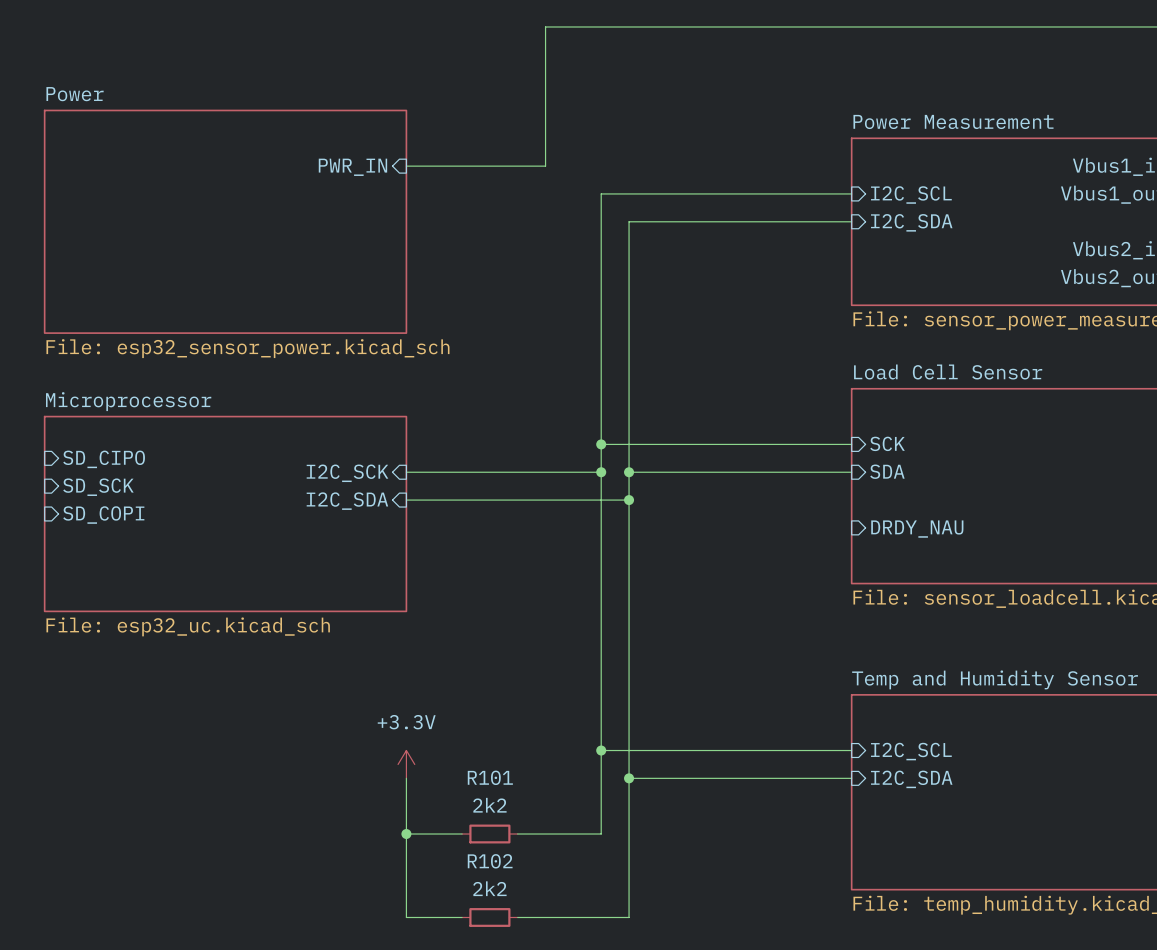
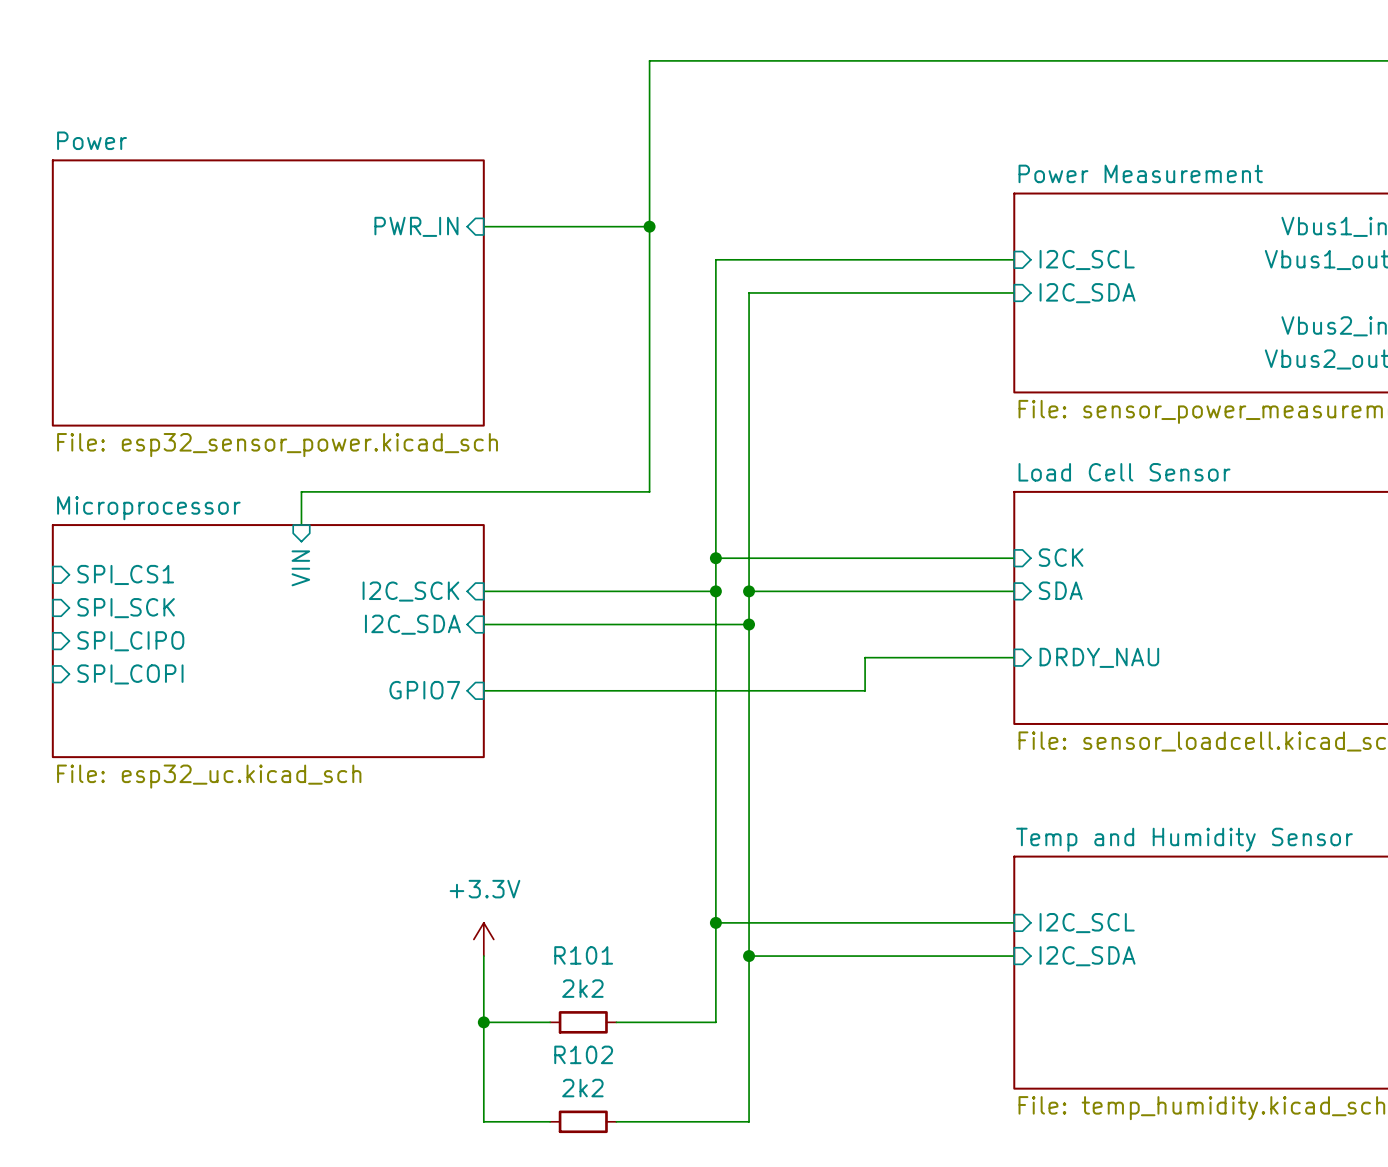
wire: none -> (649, 226) (649, 491) (301, 491) (301, 525)
junction: none -> (649, 226)
sheet pin: none -> VIN (300, 568)
sheet pin: SD_CIPO (104, 459) -> SPI_CS1 (125, 574)
sheet pin: SD_SCK (98, 487) -> SPI_SCK (126, 608)
sheet pin: SD_COPI (103, 515) -> SPI_CIPO (130, 641)
wire: none -> (1014, 657) (865, 657) (865, 690) (483, 690)
sheet pin: none -> SPI_COPI (130, 674)
sheet pin: none -> GPIO7 (424, 690)

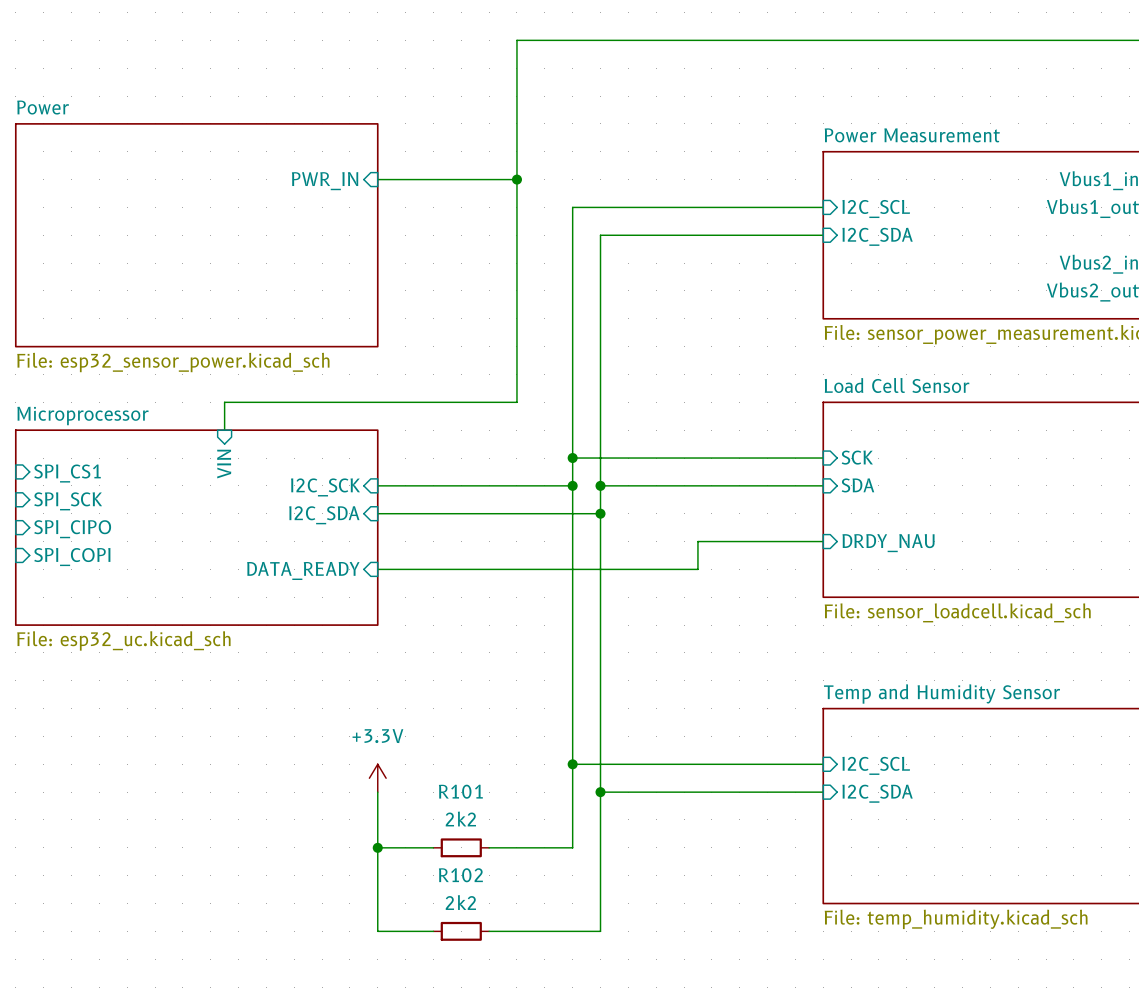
sheet pin: GPIO7 (424, 690) -> DATA_READY (303, 570)

